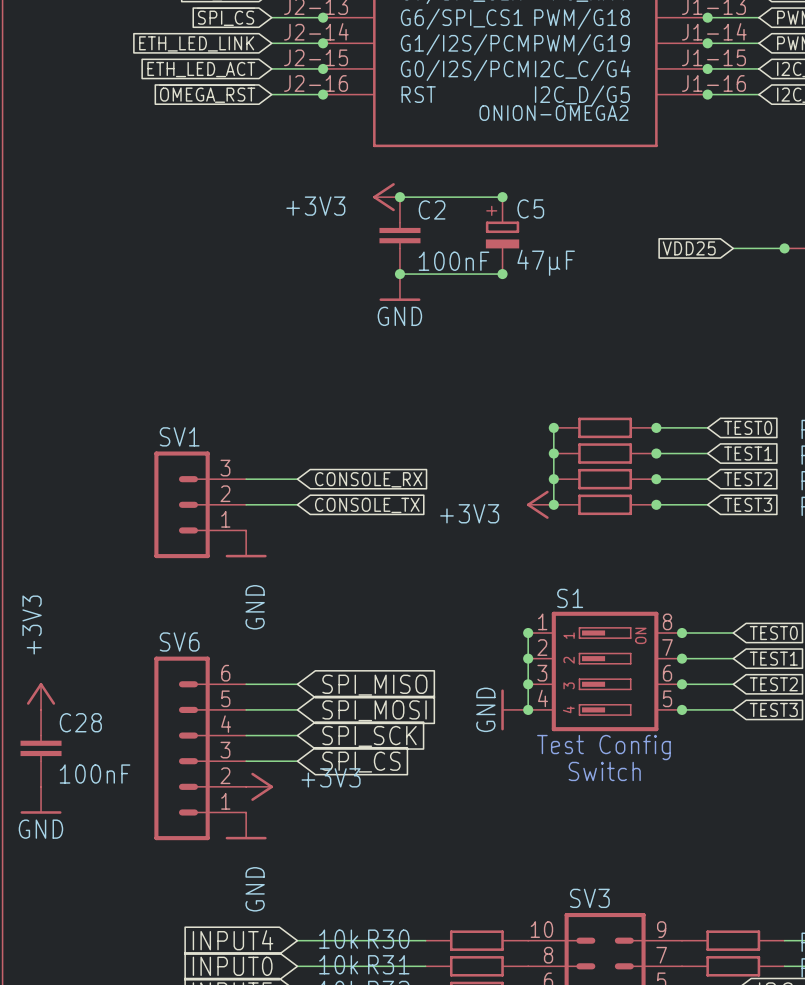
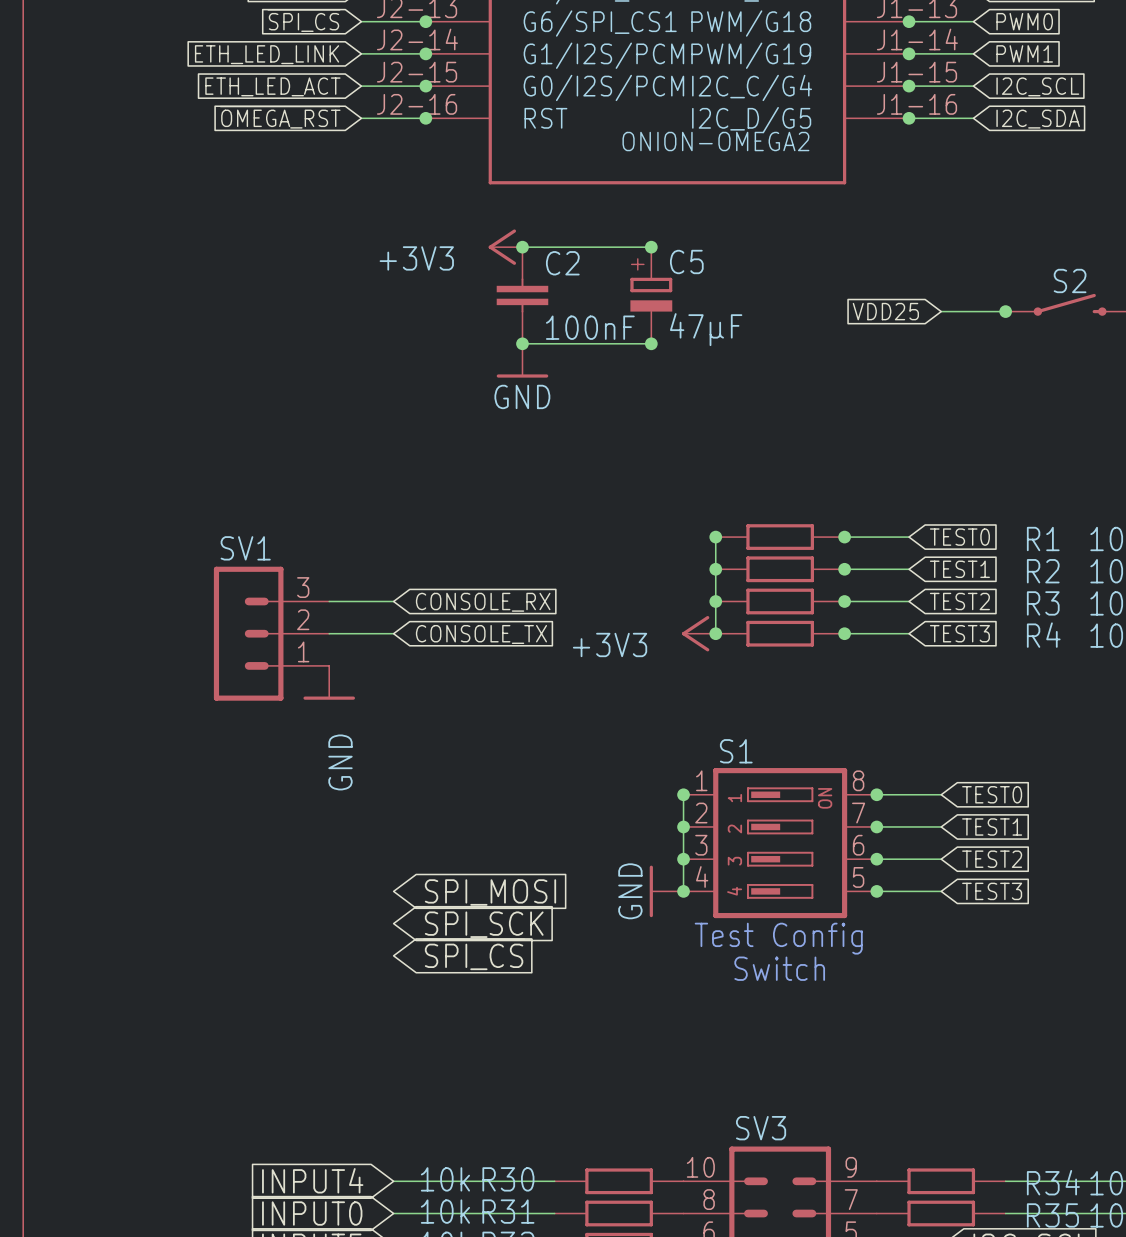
wire: (246, 684) (297, 684) -> none
global label: SPI_MISO (374, 685) -> none
power symbol: +3V3 (41, 696) -> none
wire: (246, 709) (297, 709) -> none
wire: (246, 735) (297, 735) -> none
C28: 100nF (41, 748) -> none
SV6: (200, 748) -> none
wire: (246, 761) (297, 761) -> none
power symbol: +3V3 (259, 786) -> none
power symbol: GND (41, 800) -> none
power symbol: GND (246, 825) -> none

